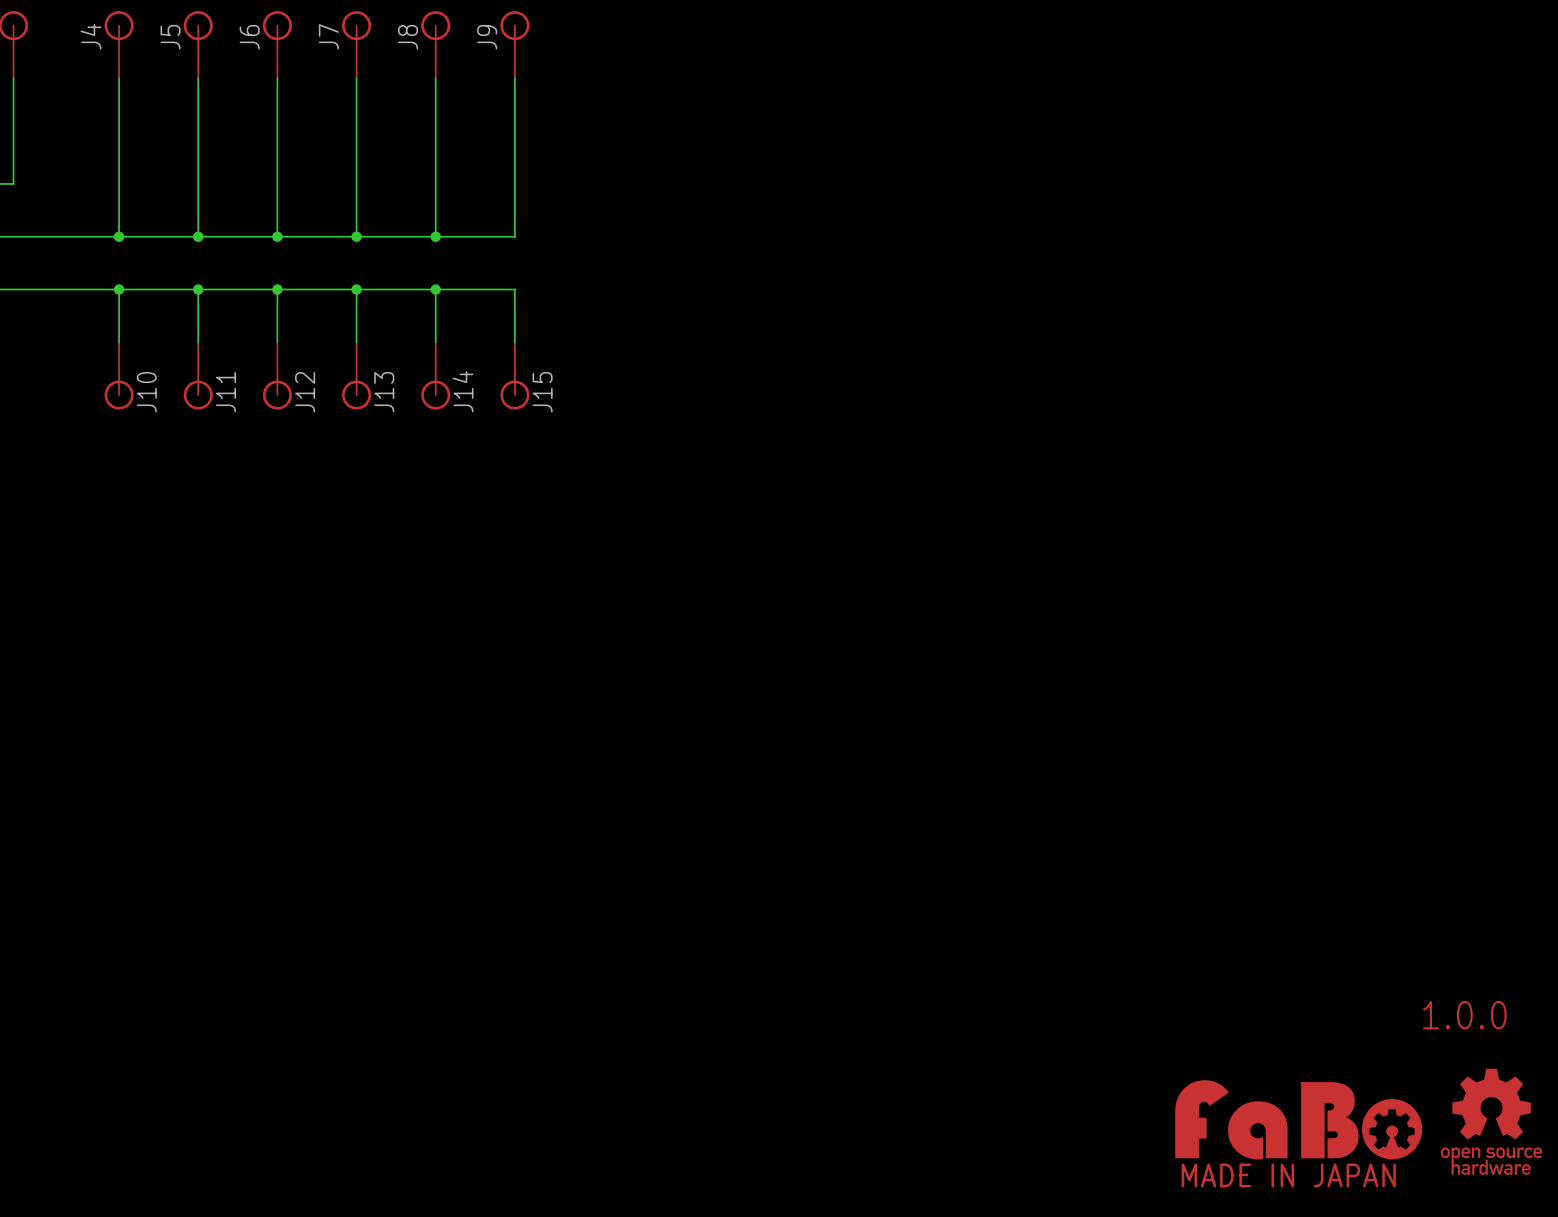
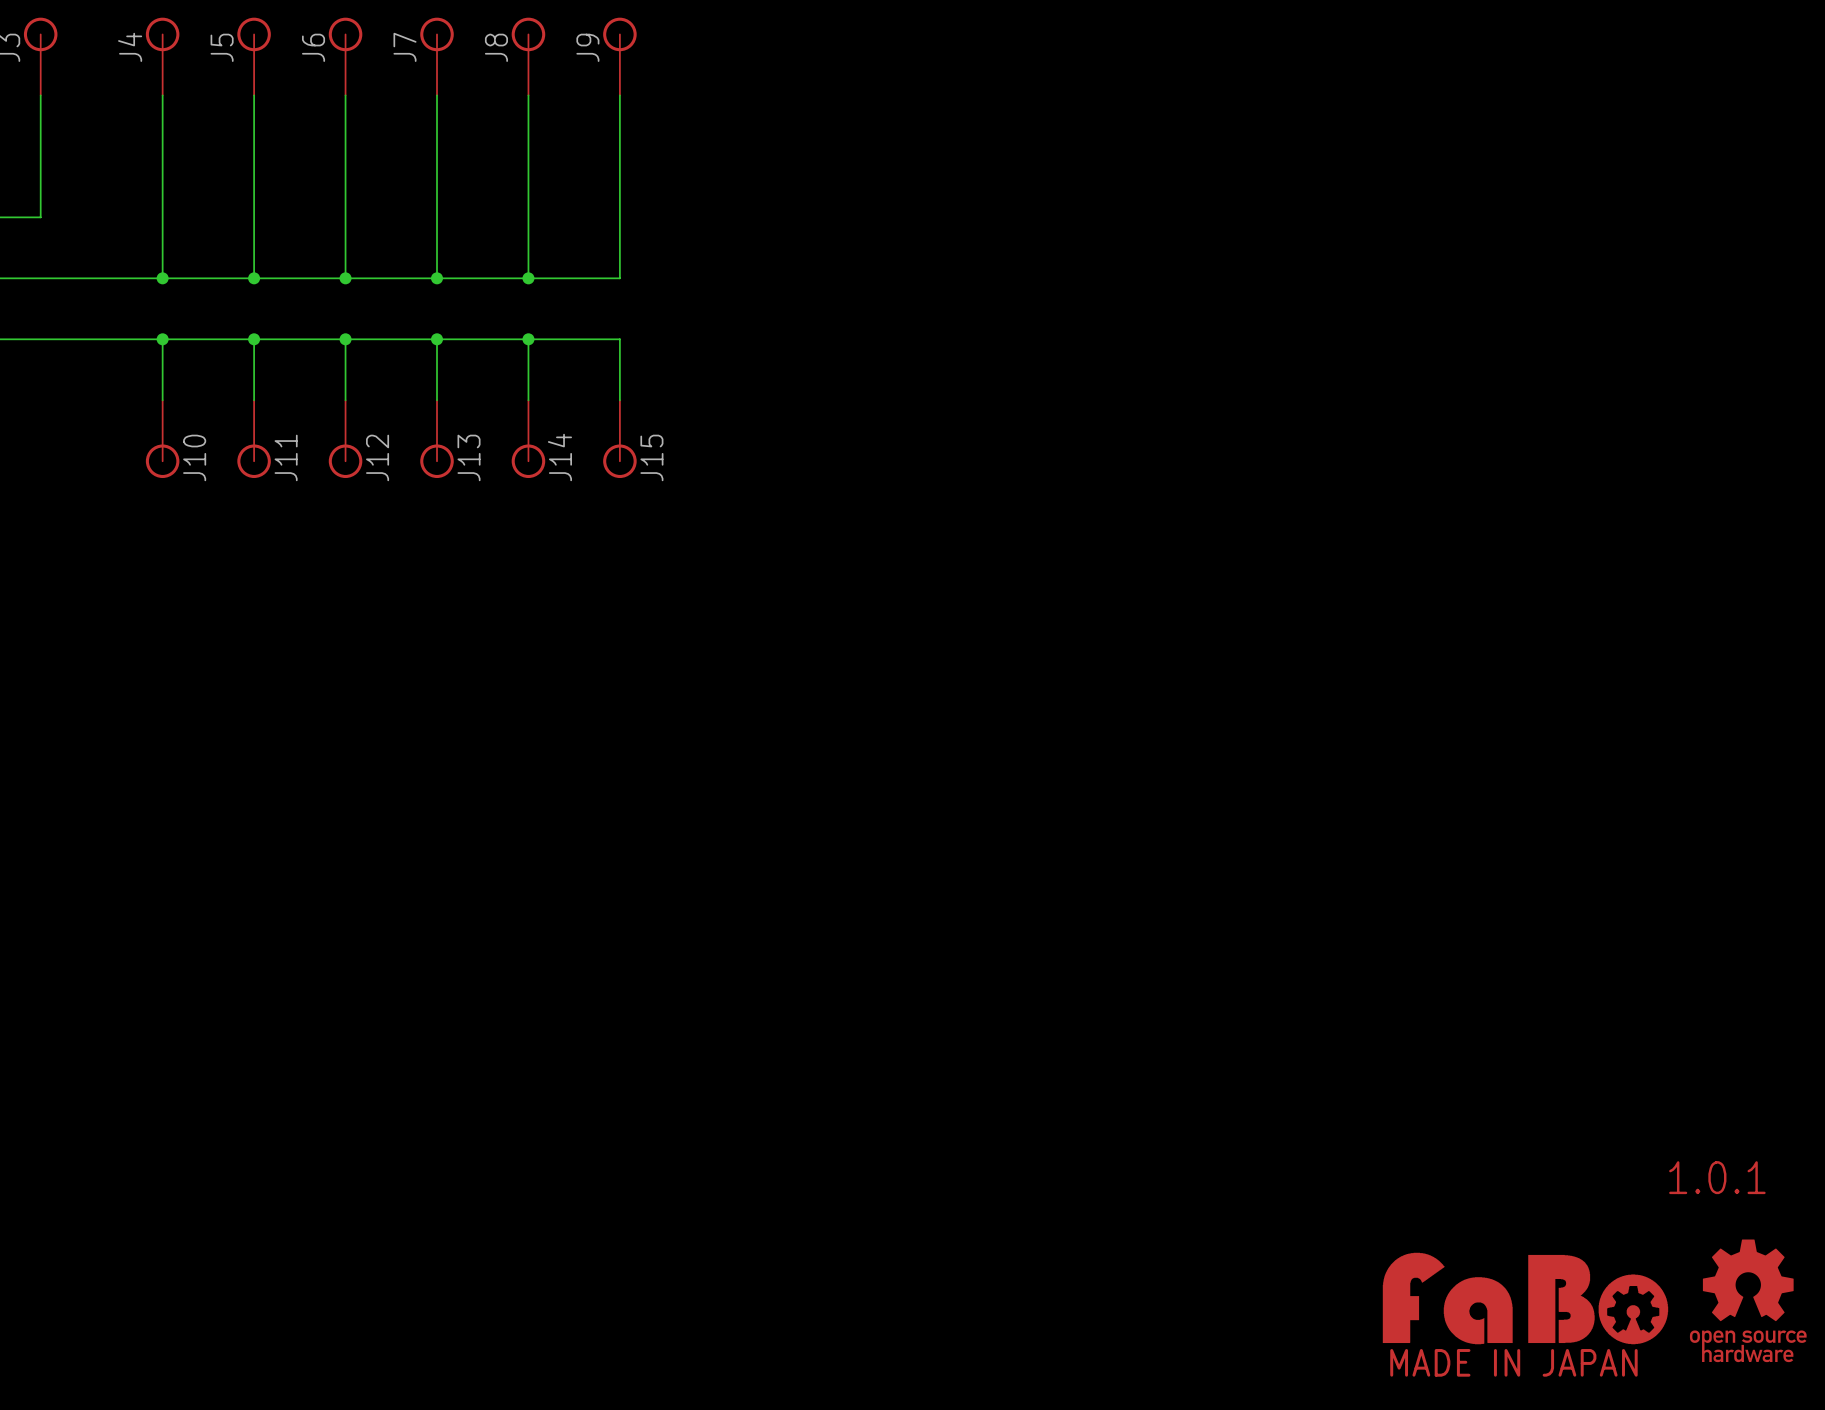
text: 1.0.0 (1464, 1015) -> 1.0.1 (1717, 1177)

